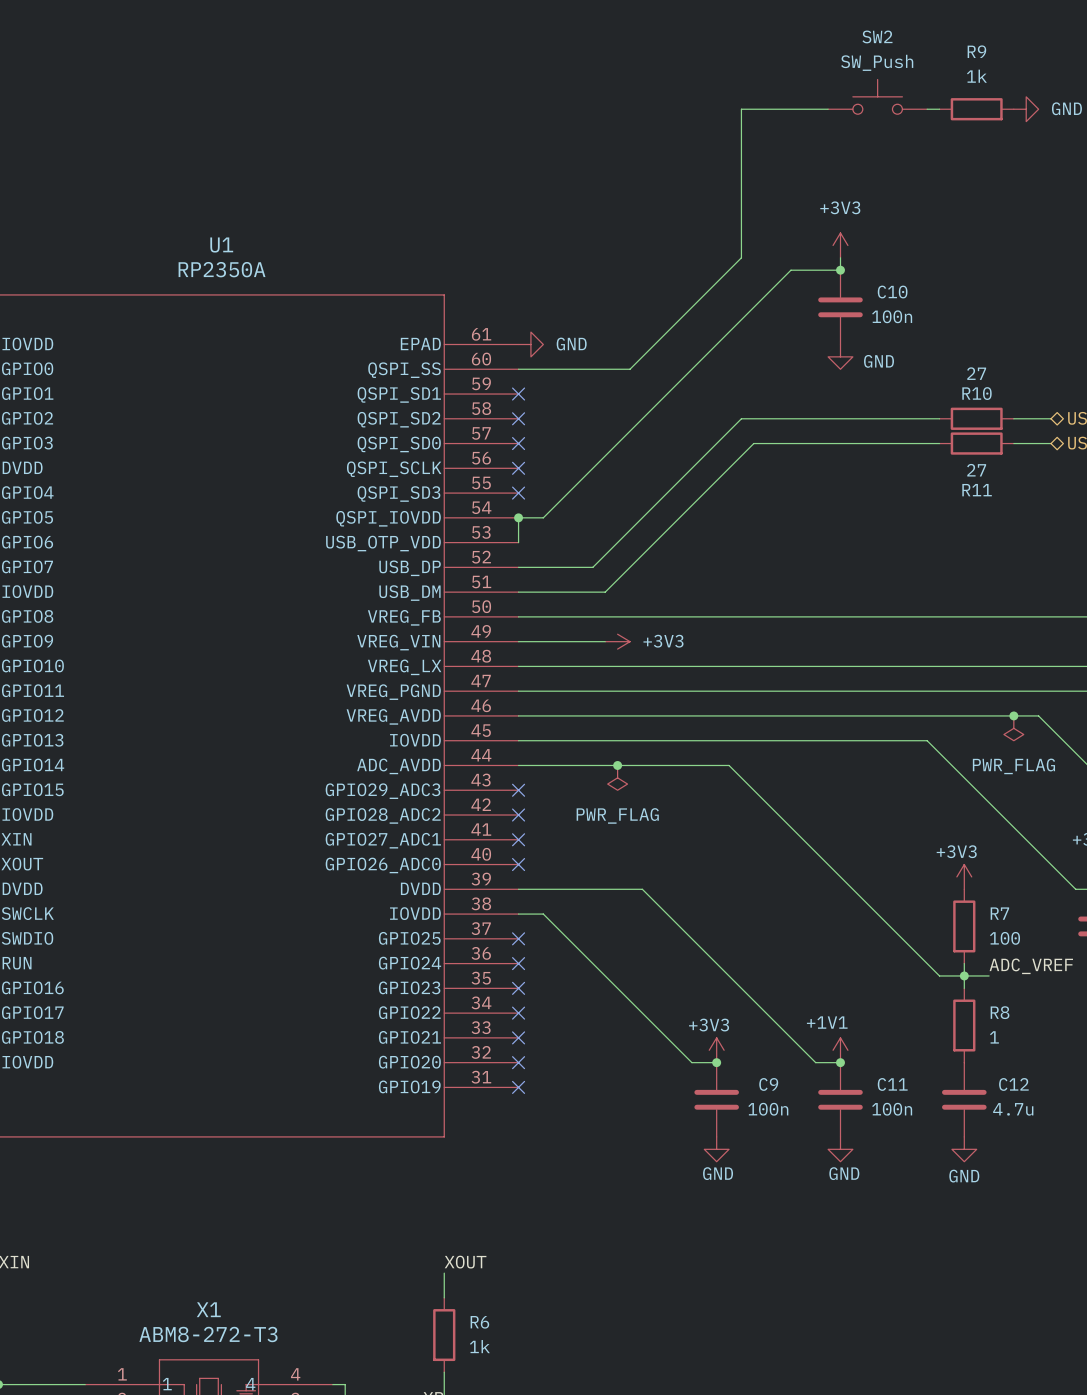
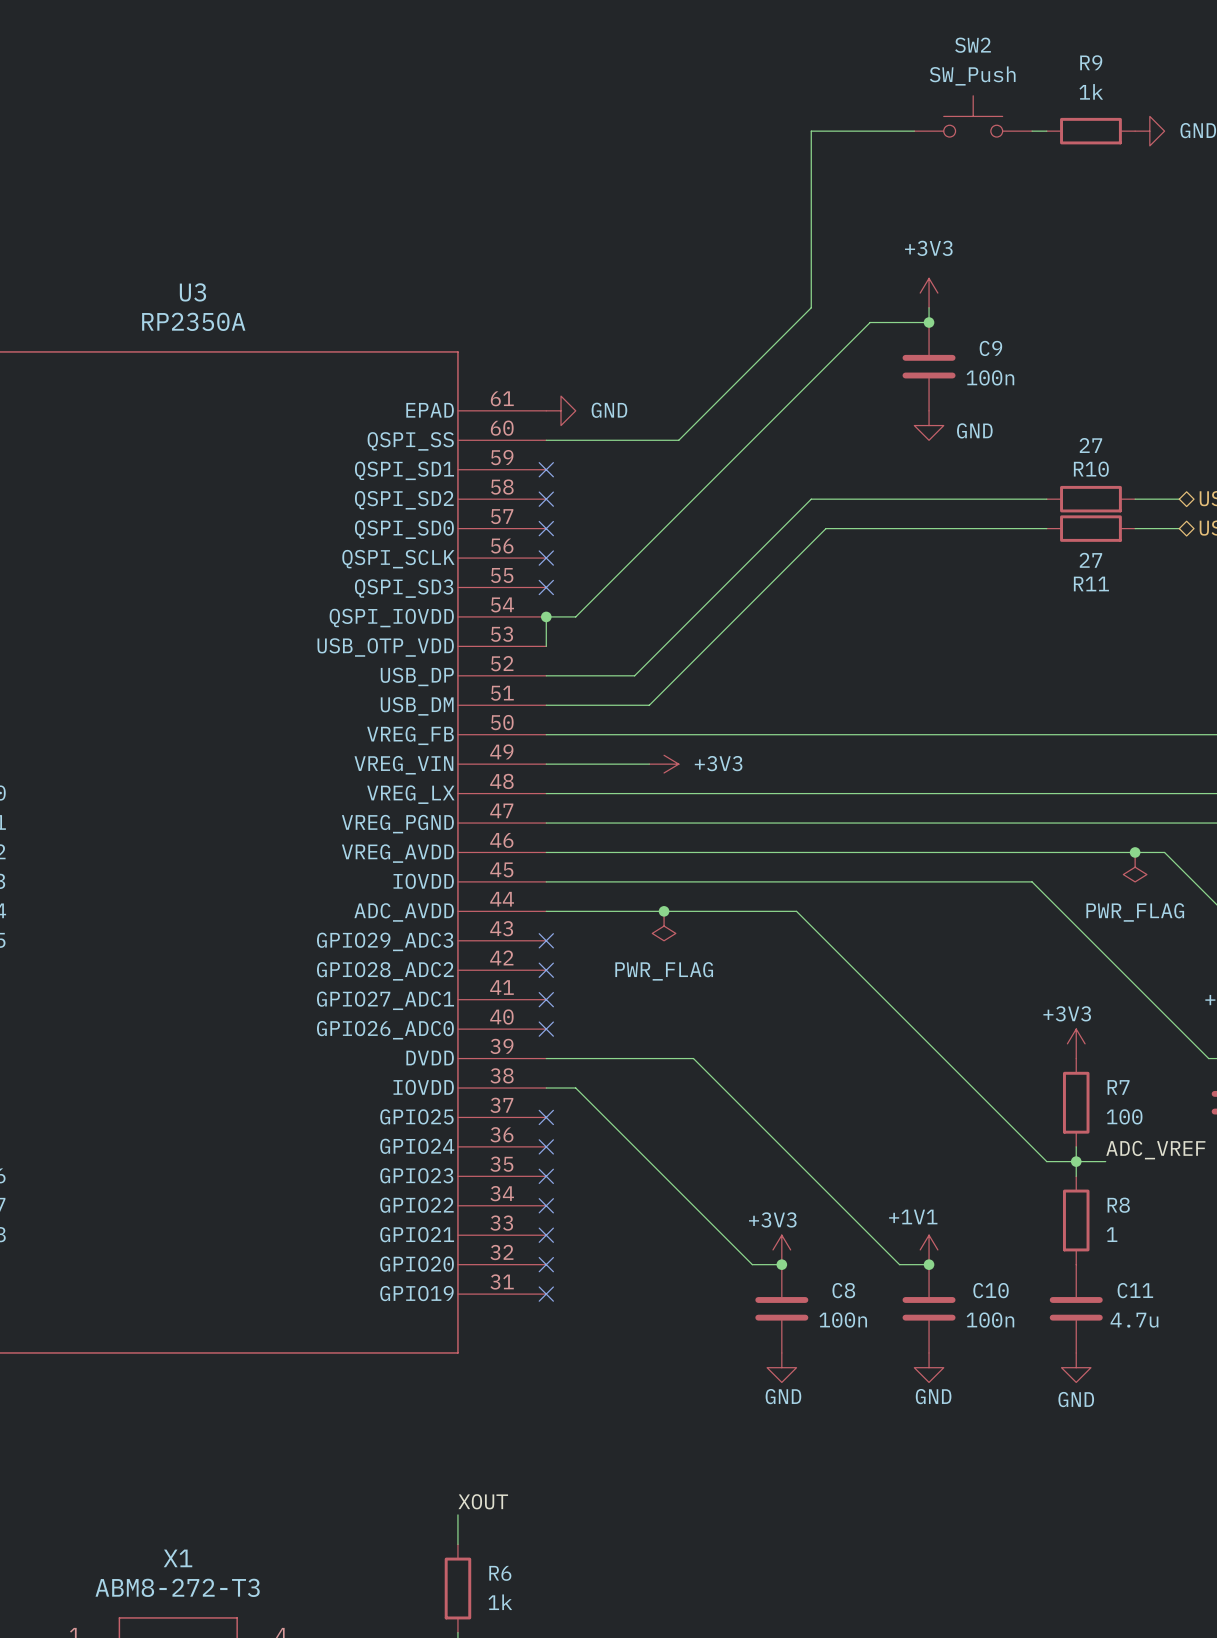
U1 name: U1 (221, 245) -> U3 (192, 292)
C10 name: C10 (892, 292) -> C9 (990, 348)
C9 name: C9 (768, 1084) -> C8 (843, 1290)
C11 name: C11 (892, 1084) -> C10 (991, 1290)
C12 name: C12 (1013, 1084) -> C11 (1135, 1290)

